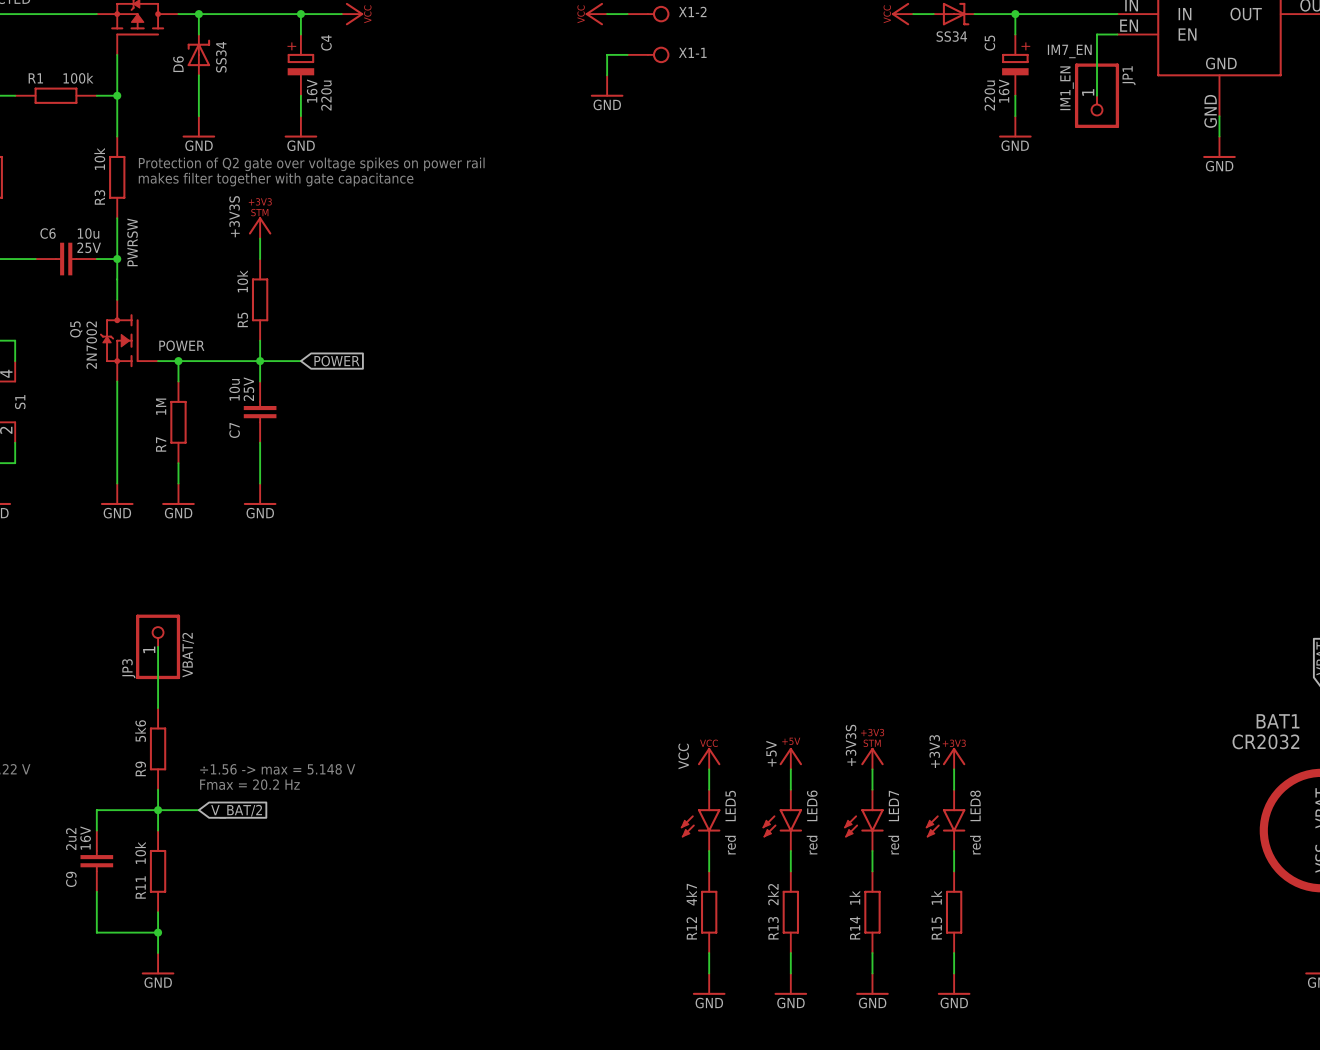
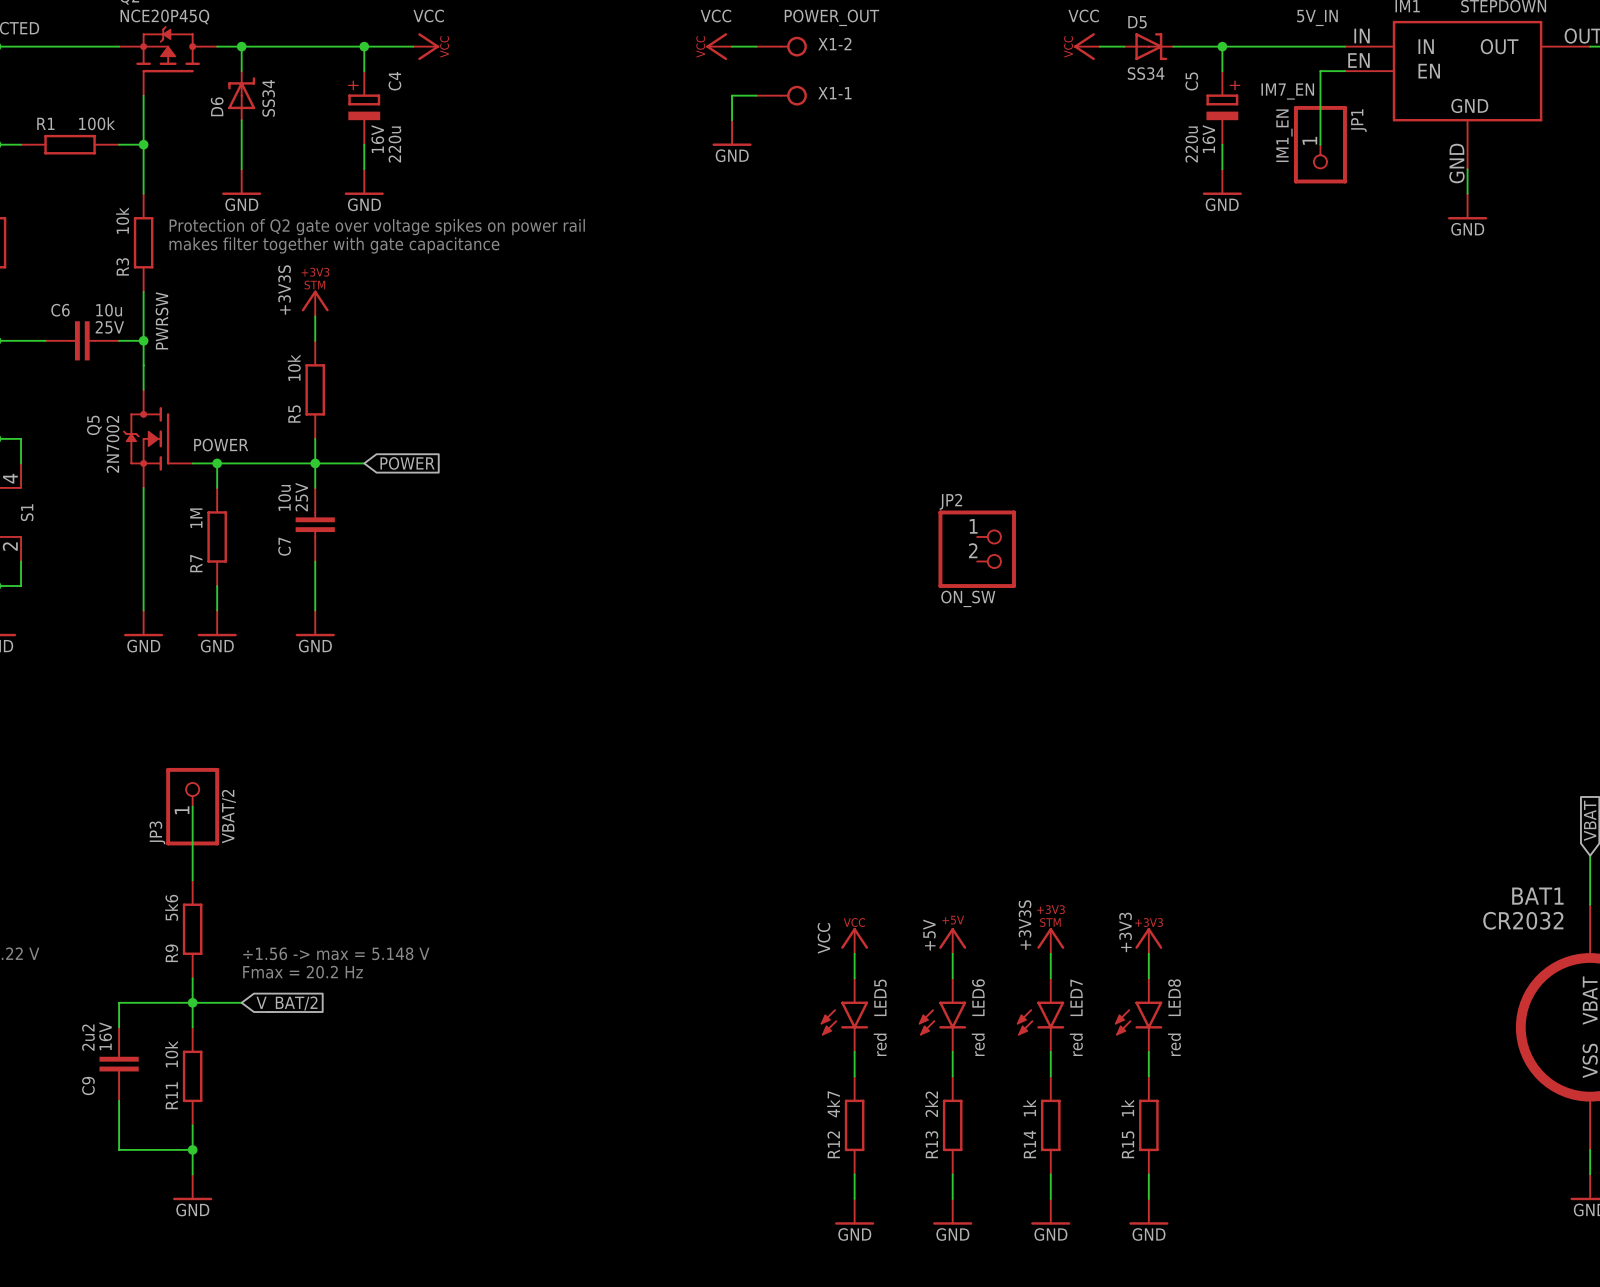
JP2: none -> ON_SW (977, 549)

